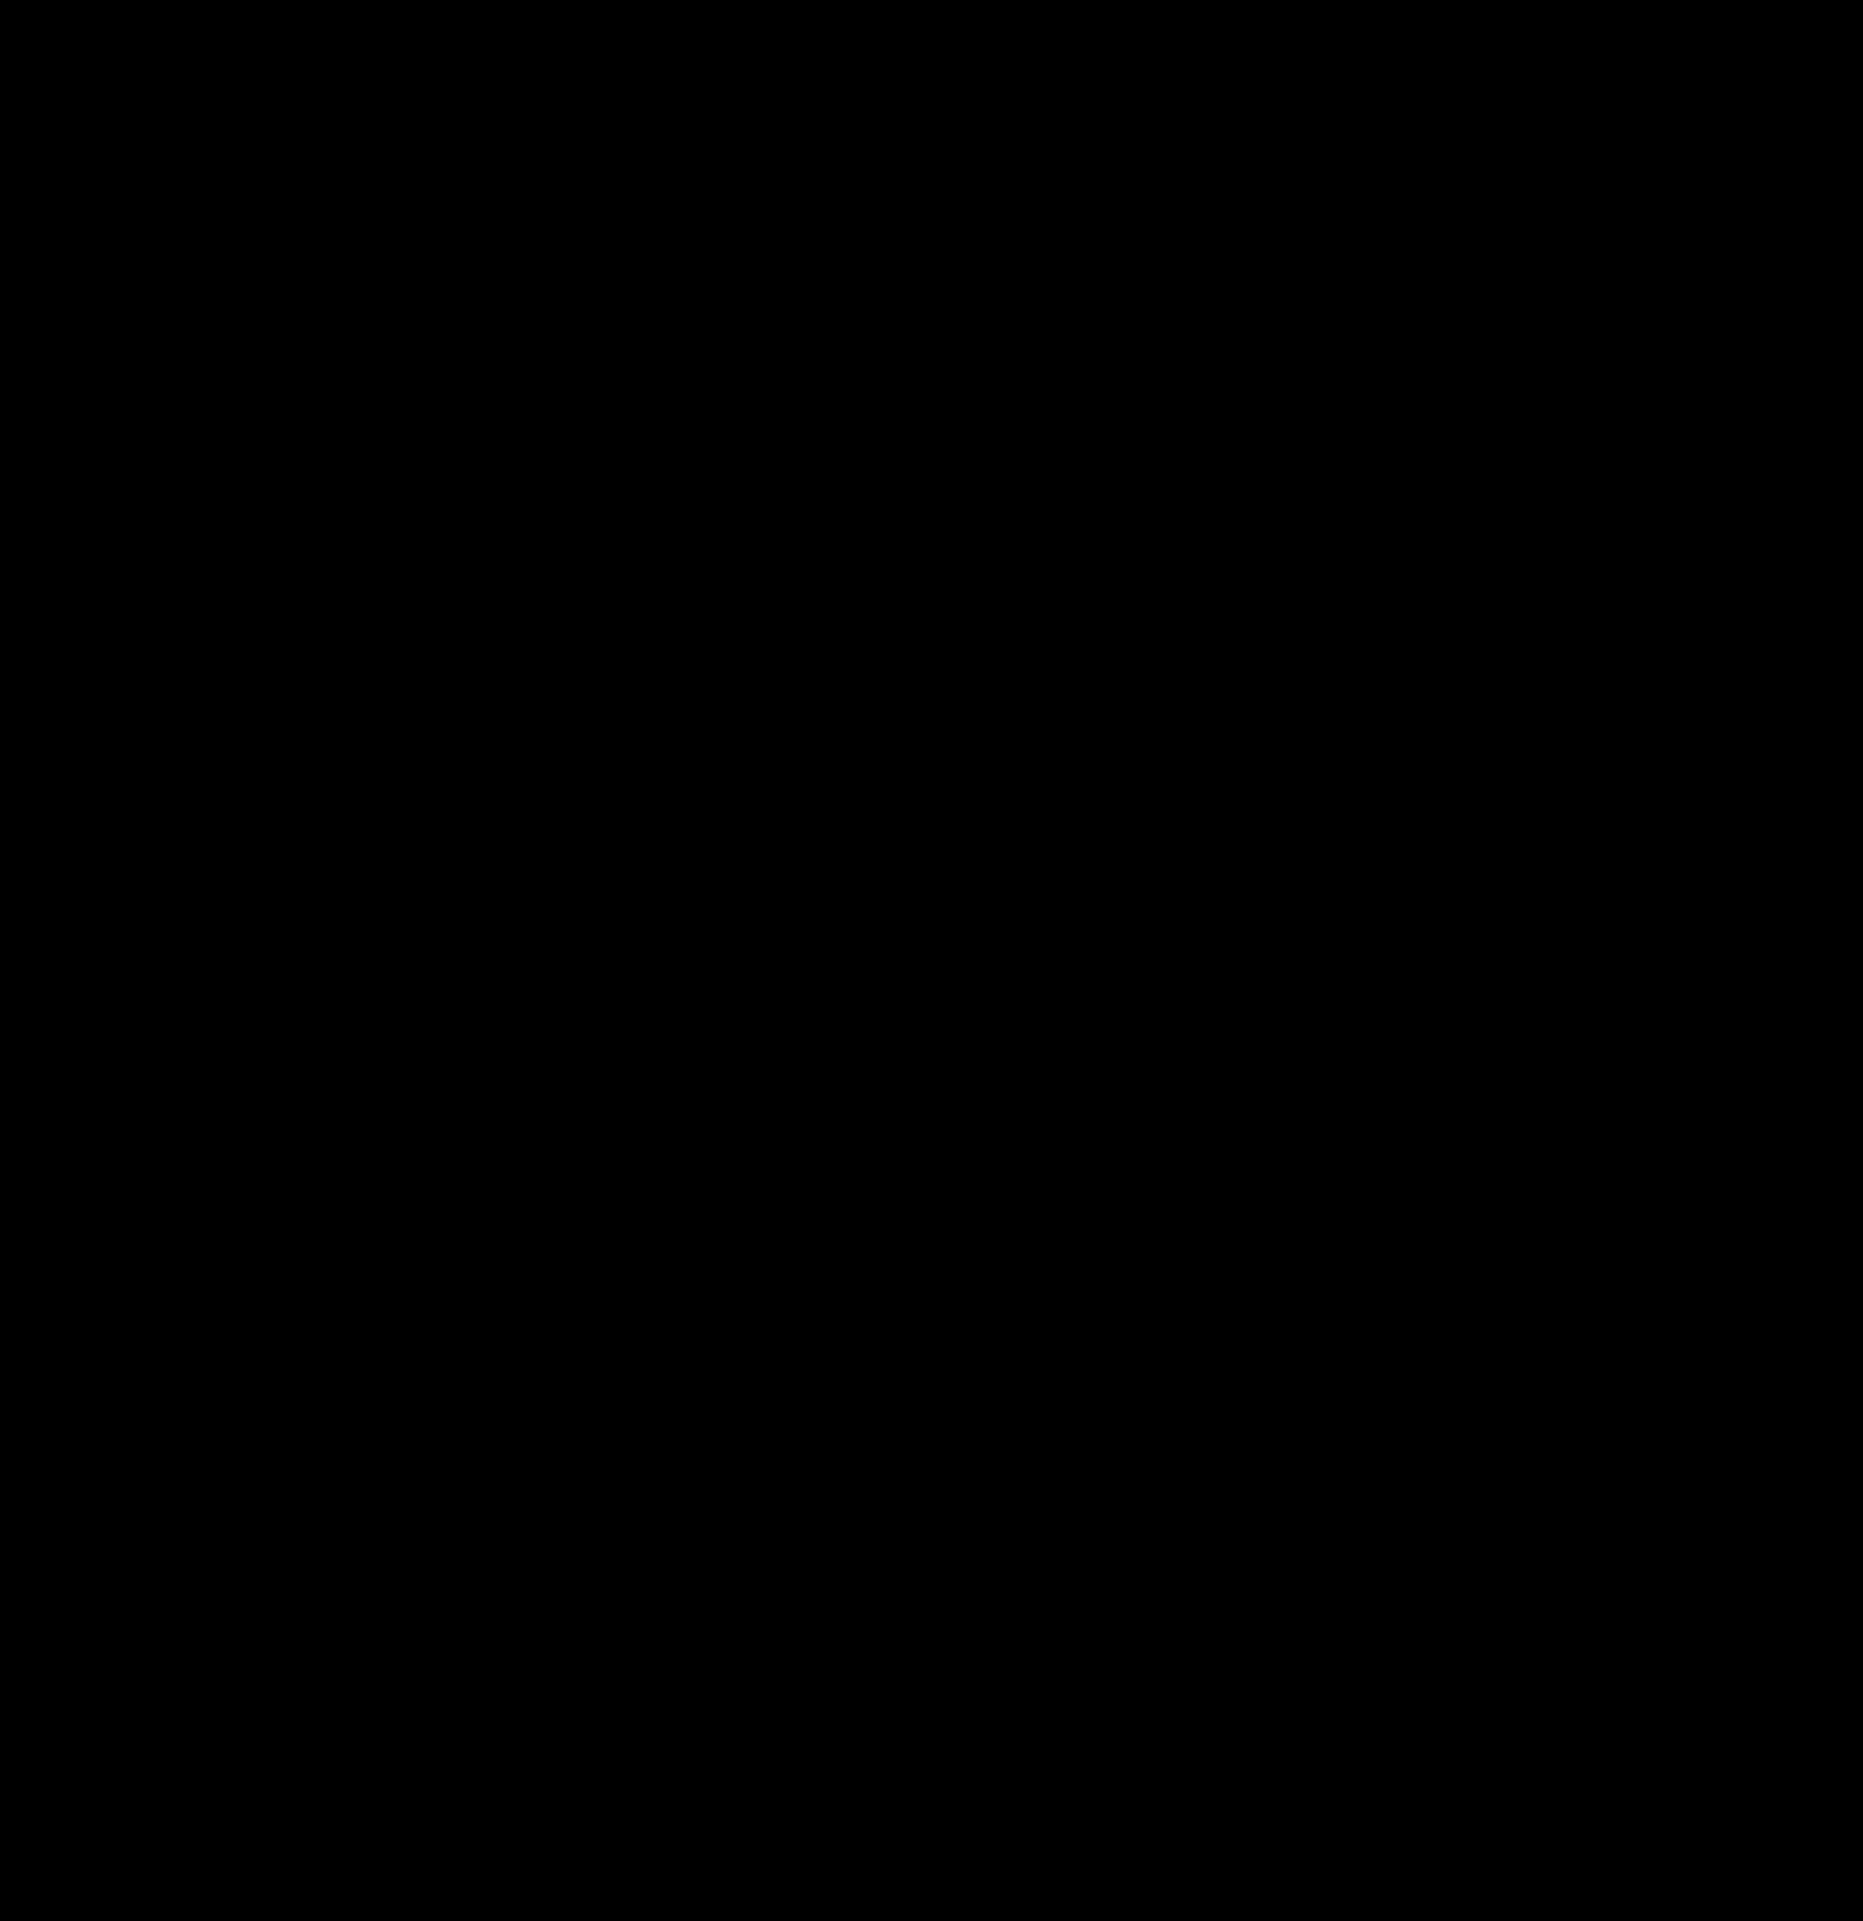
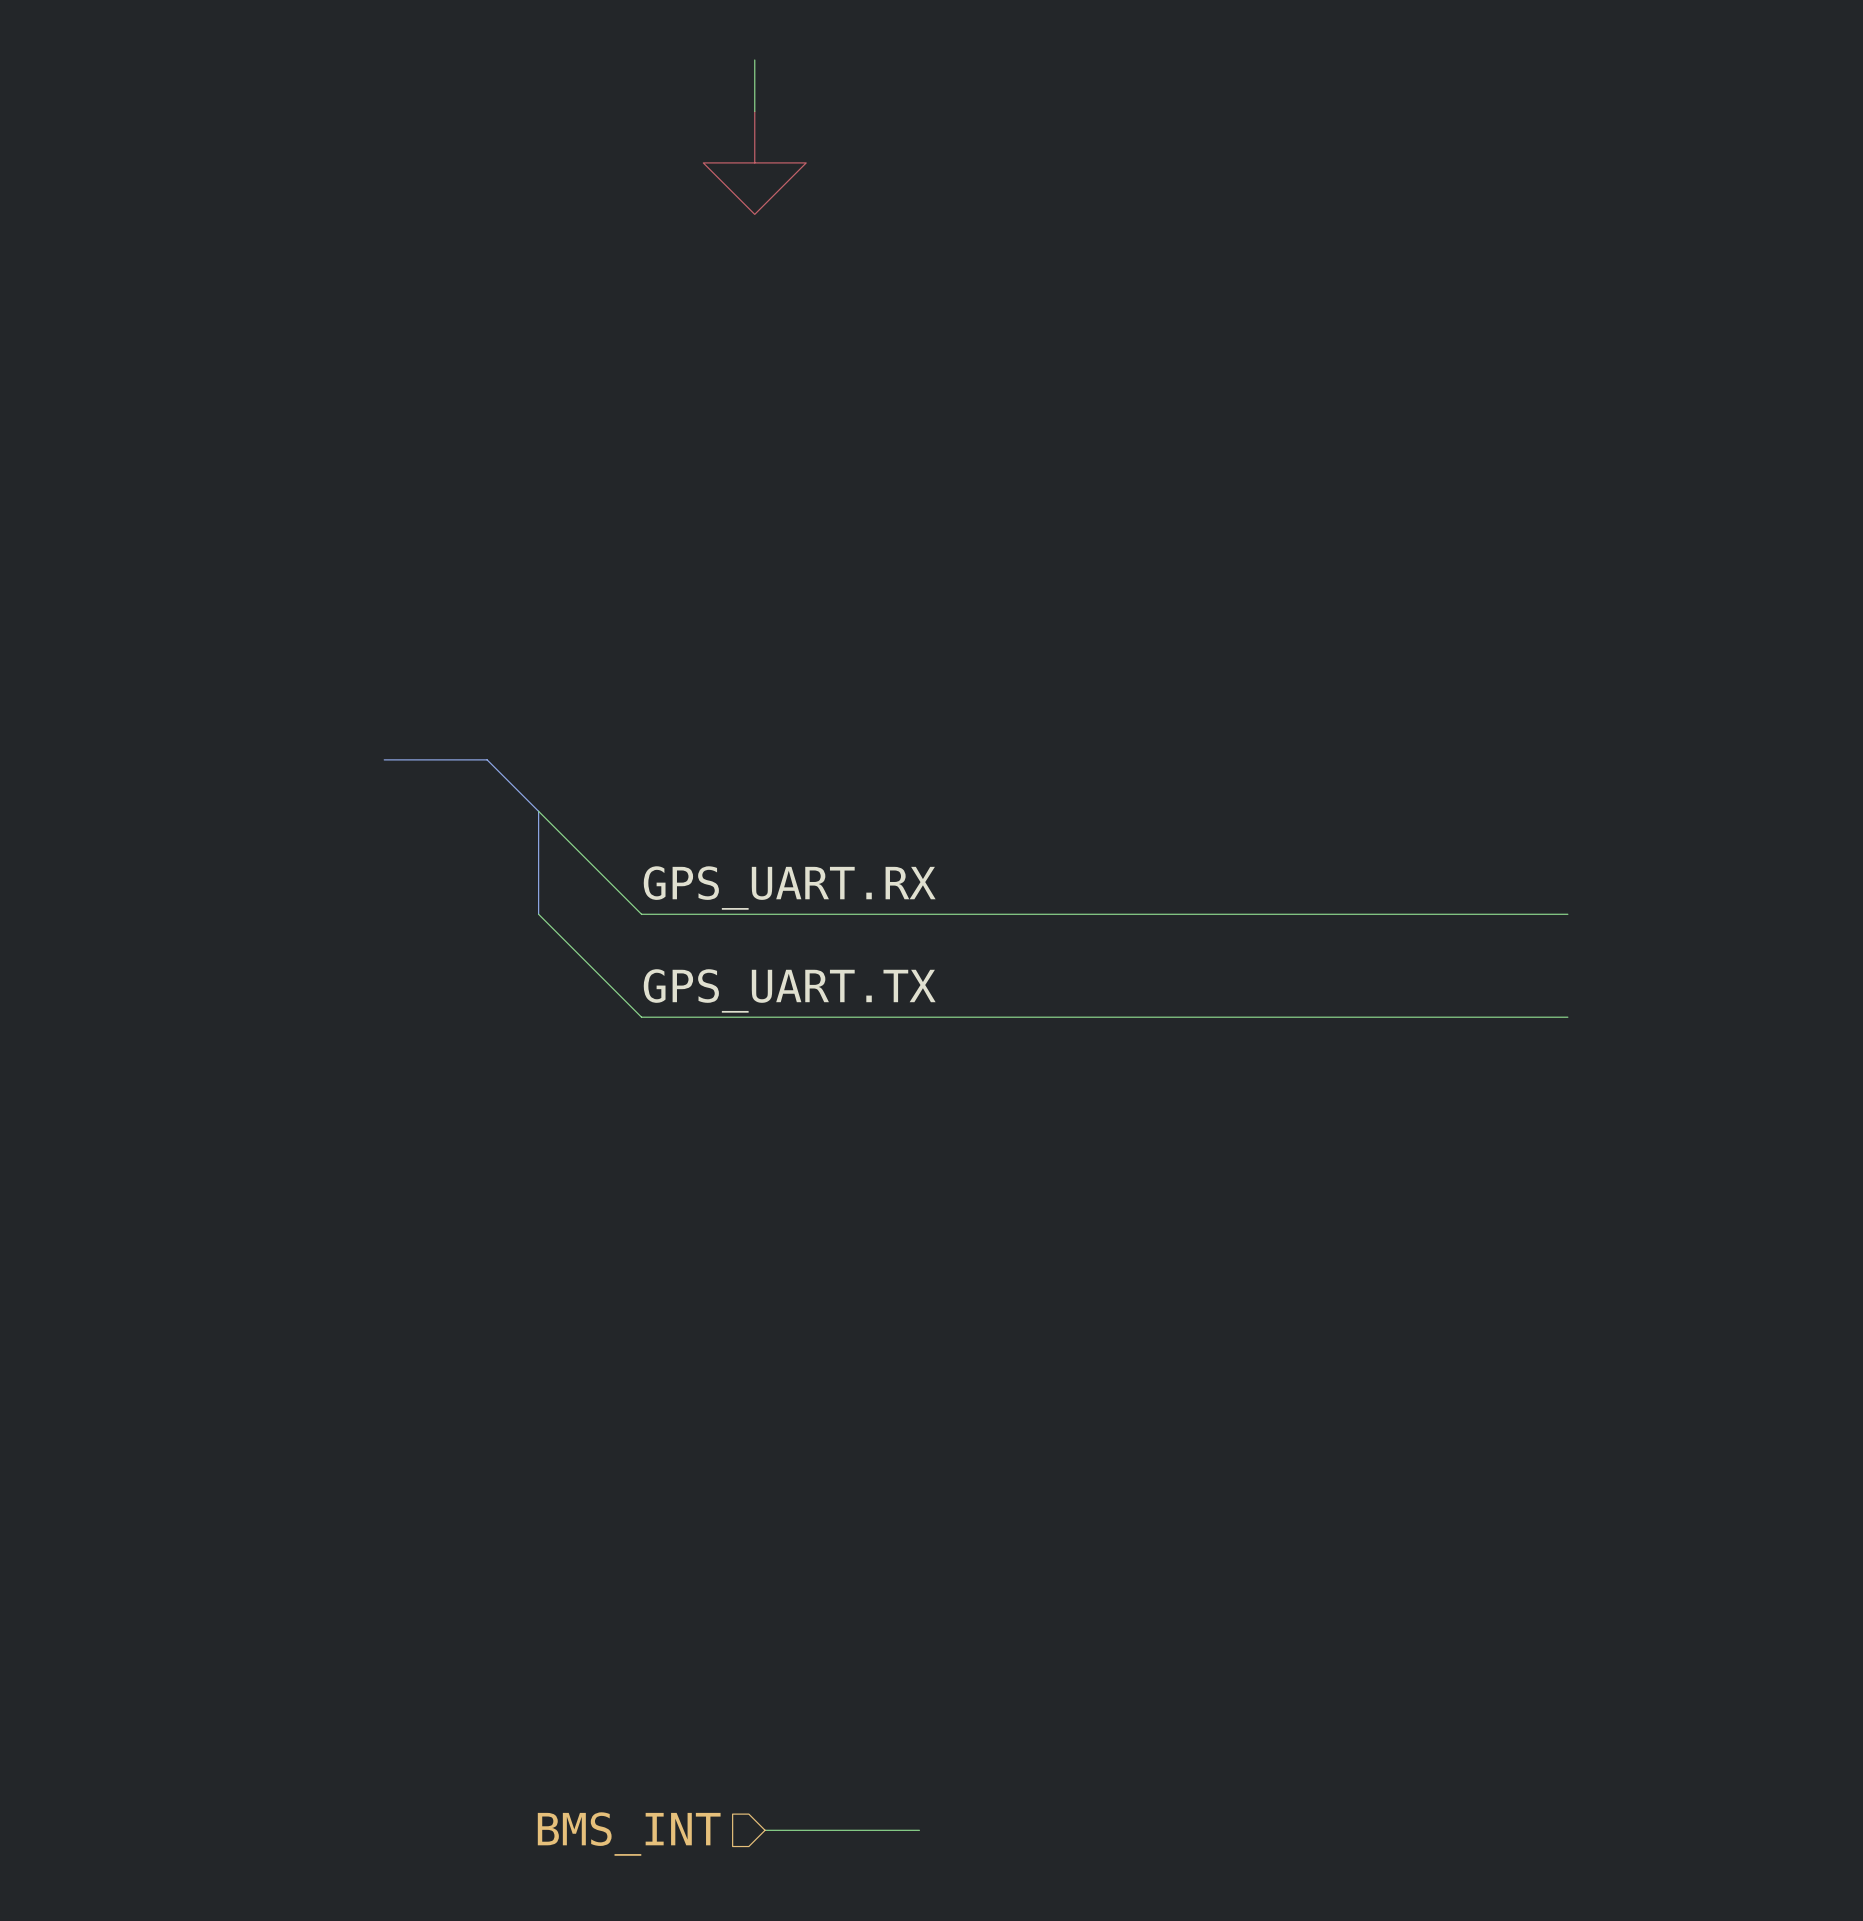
wire: none -> (754, 60) (754, 111)
power symbol: none -> (754, 162)
bus: none -> (384, 759) (487, 759) (538, 811) (538, 914)
wire: none -> (538, 811) (641, 914) (1567, 914)
label: none -> GPS_UART.RX (789, 888)
wire: none -> (538, 914) (641, 1017) (1567, 1017)
label: none -> GPS_UART.TX (789, 990)
wire: none -> (765, 1830) (919, 1830)
hierarchical label: none -> BMS_INT (629, 1834)

